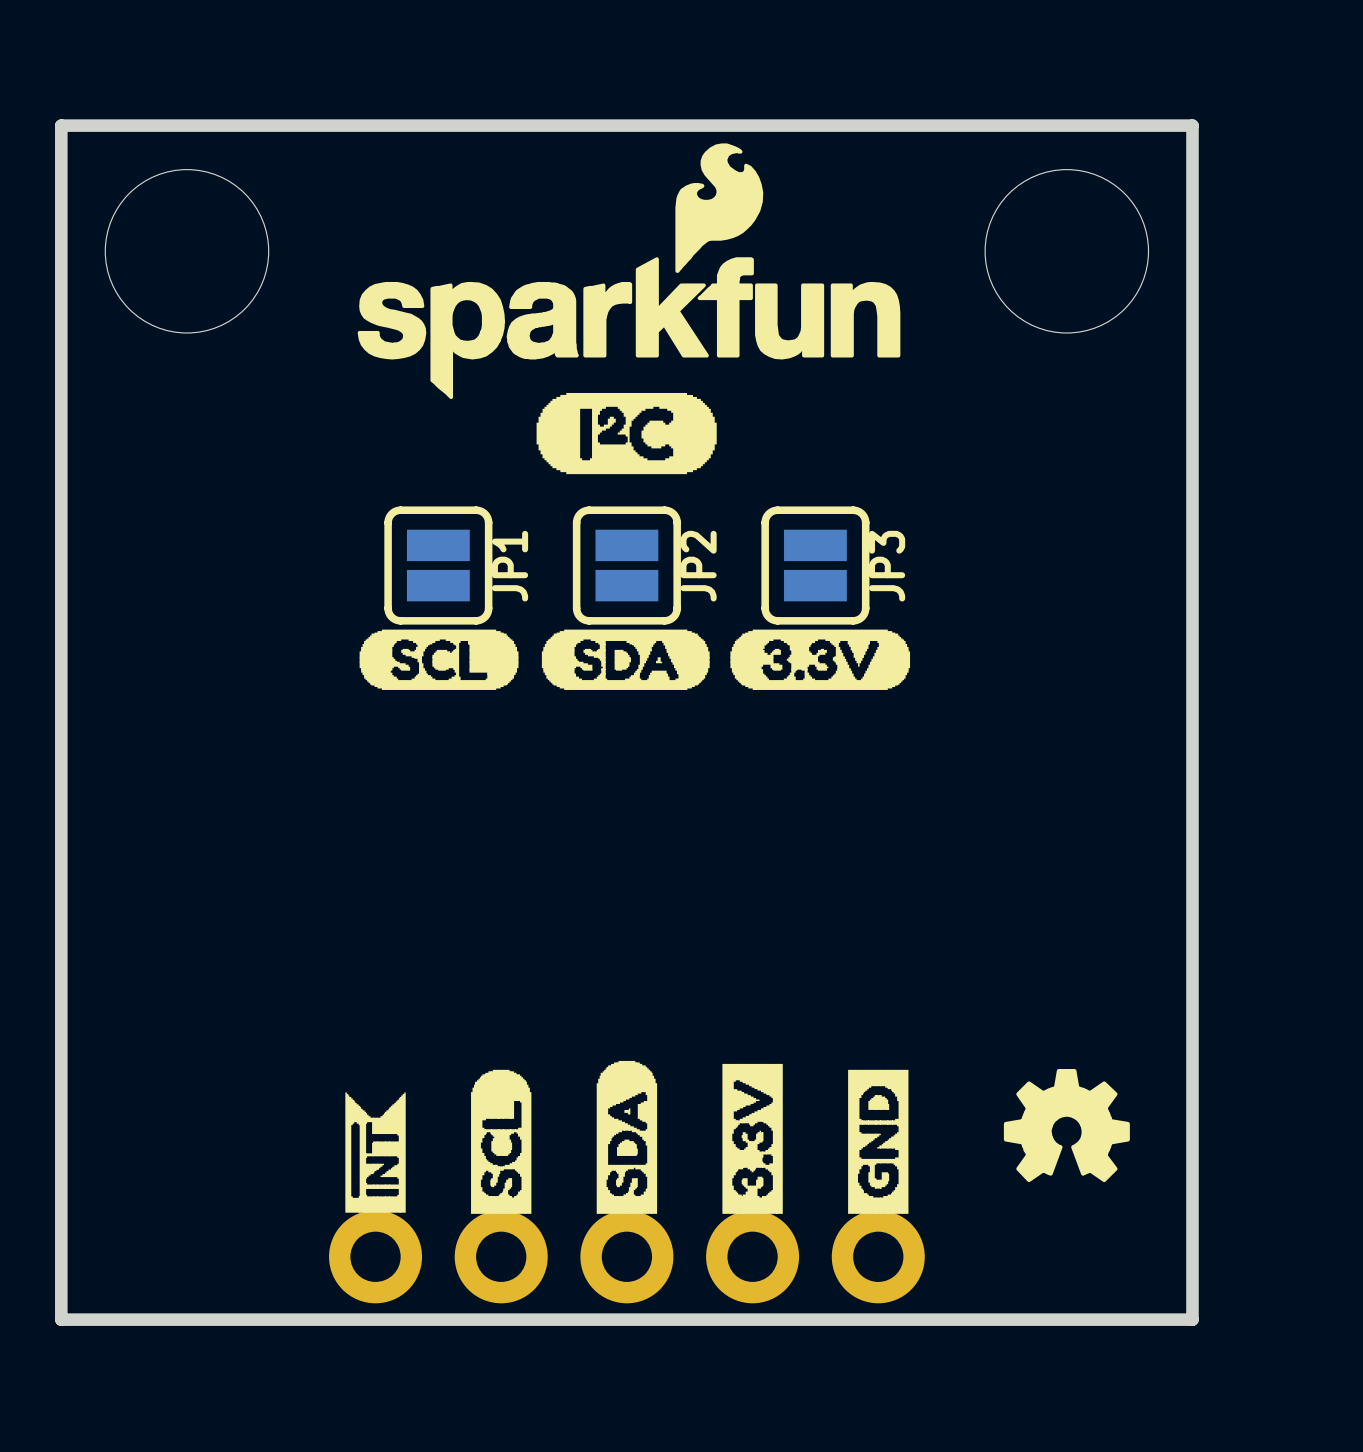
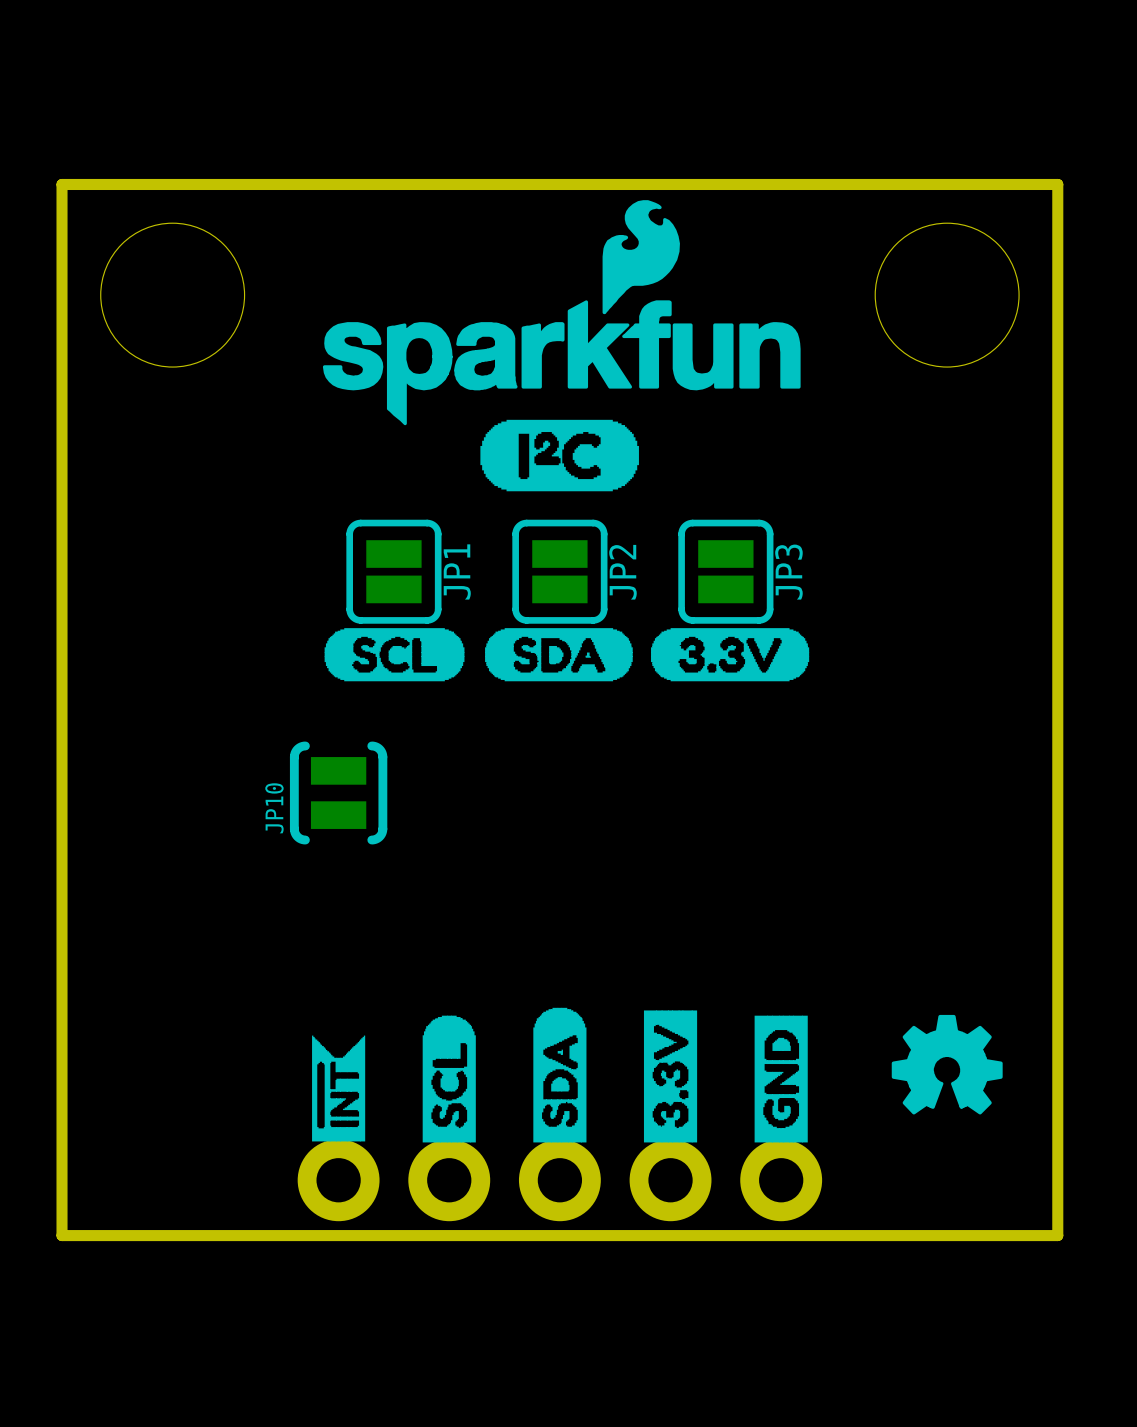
JP10: none -> (338, 793)

